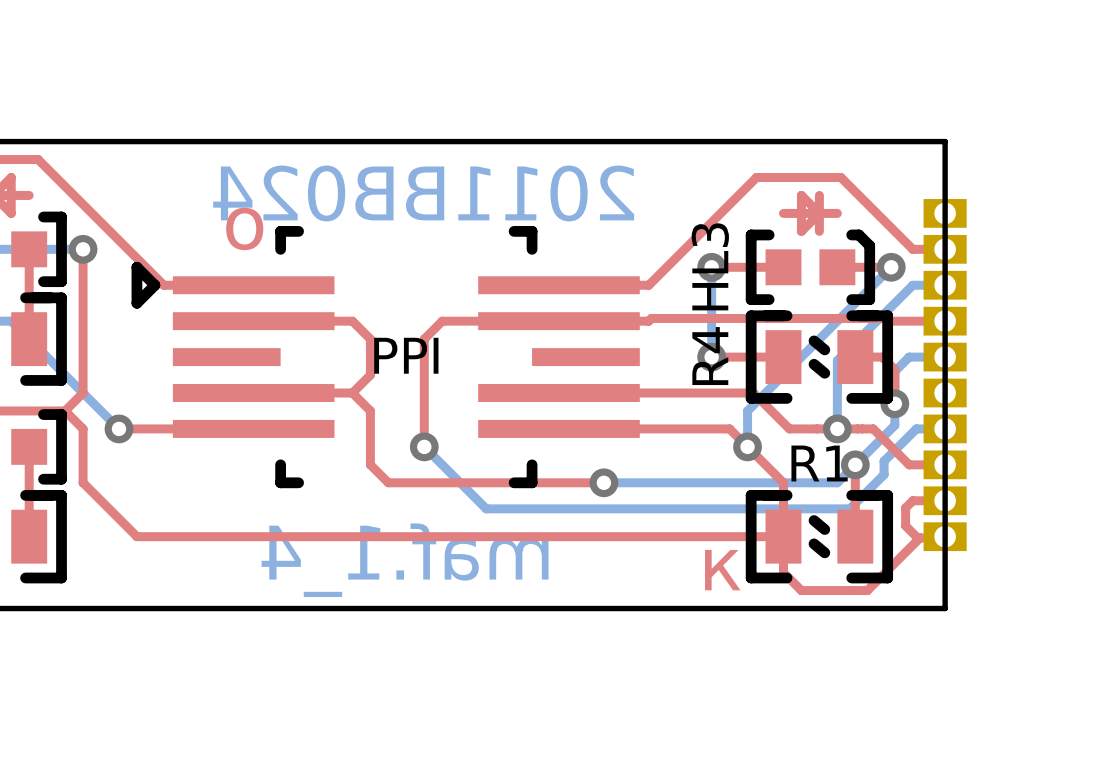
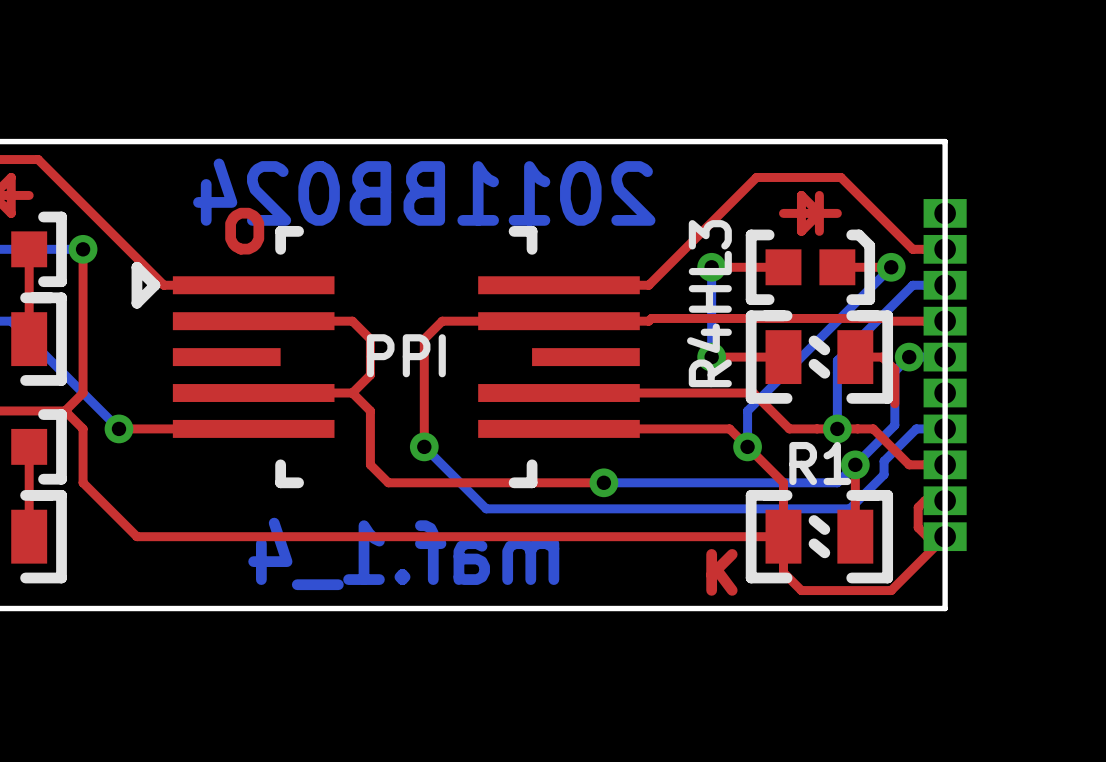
via position: (894, 403) -> (909, 357)
top track: (924, 500) (912, 500) (905, 507) (905, 525) (917, 537) (930, 537) -> none
top track: (919, 537) (867, 590) -> (924, 500) (918, 507) (918, 527) (927, 536) (945, 536) (891, 590) (867, 590)

